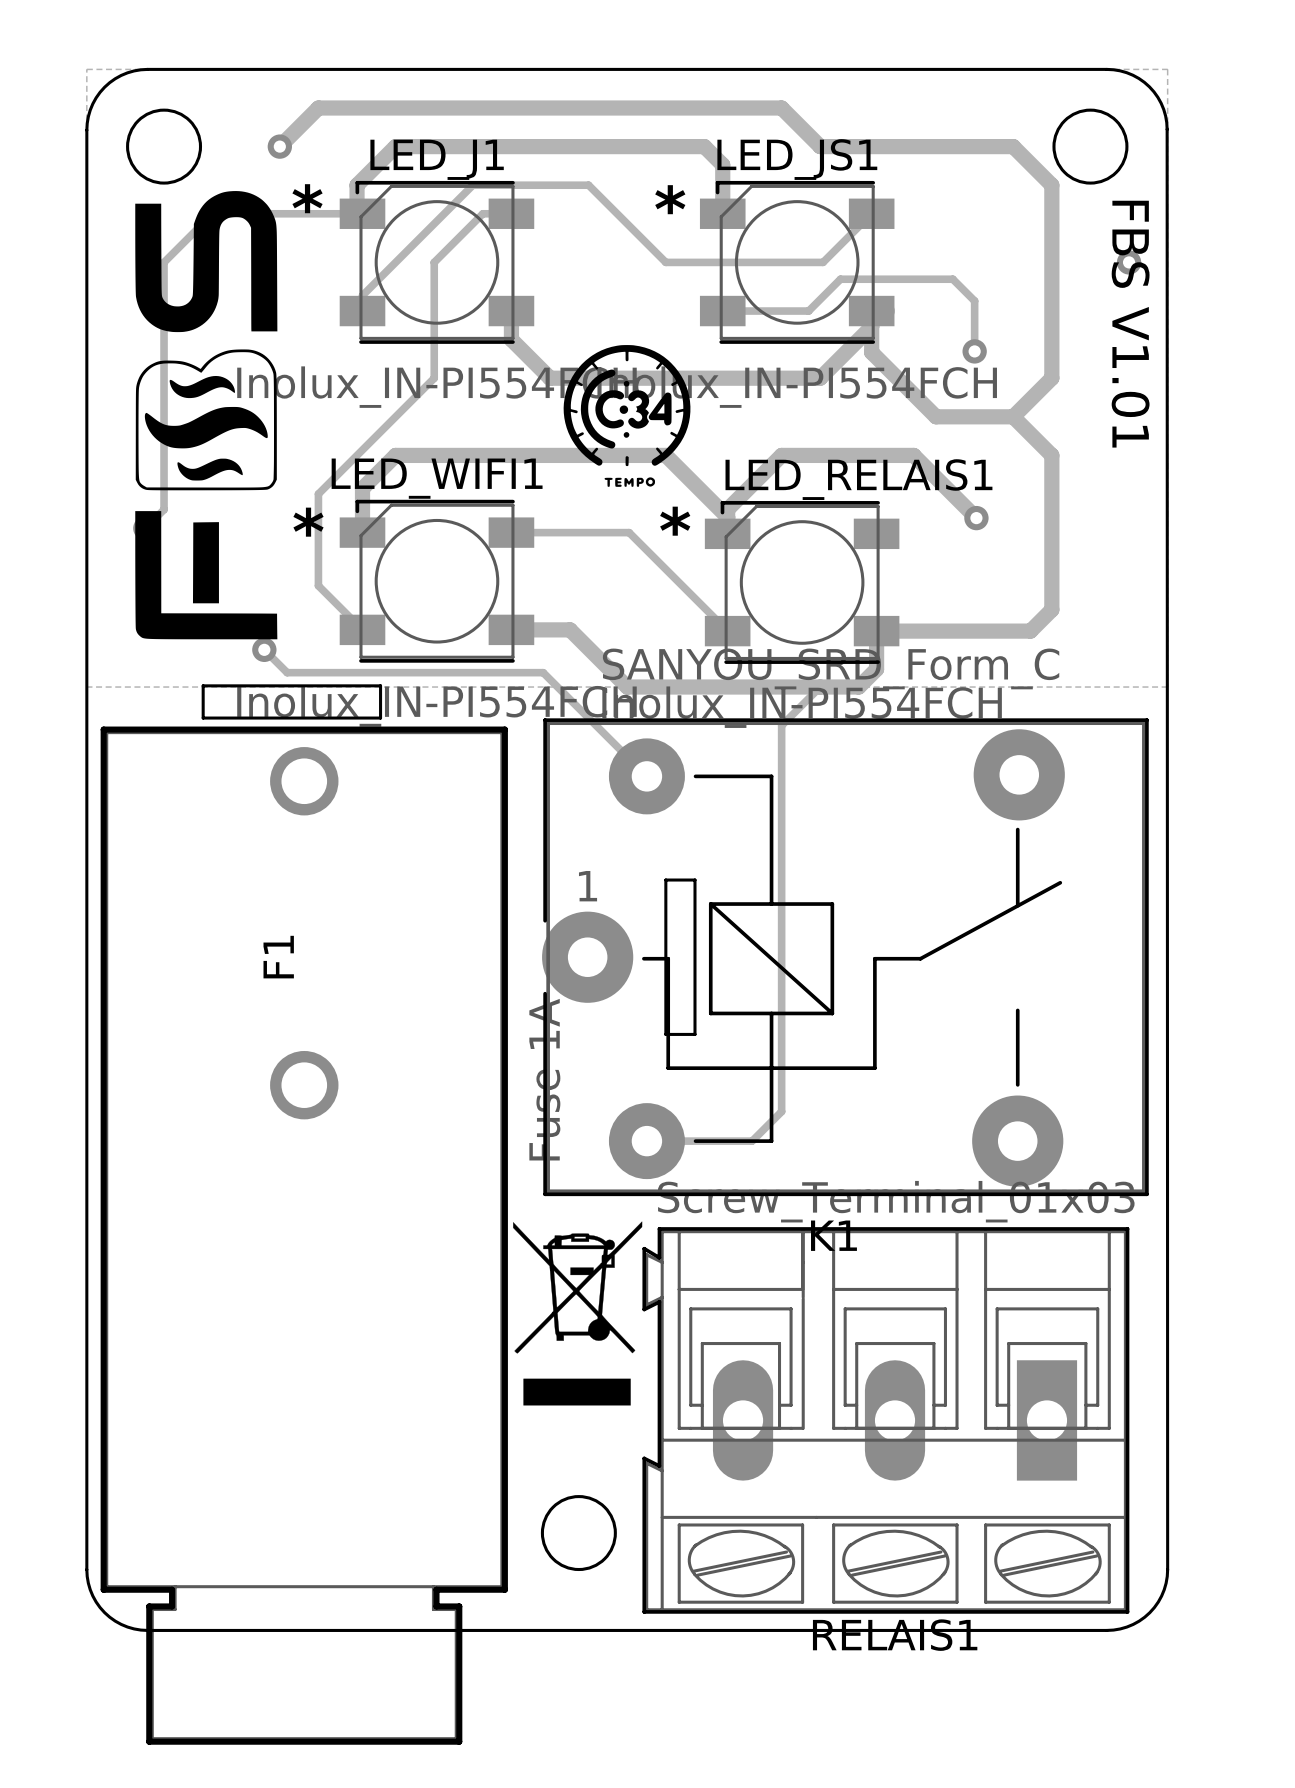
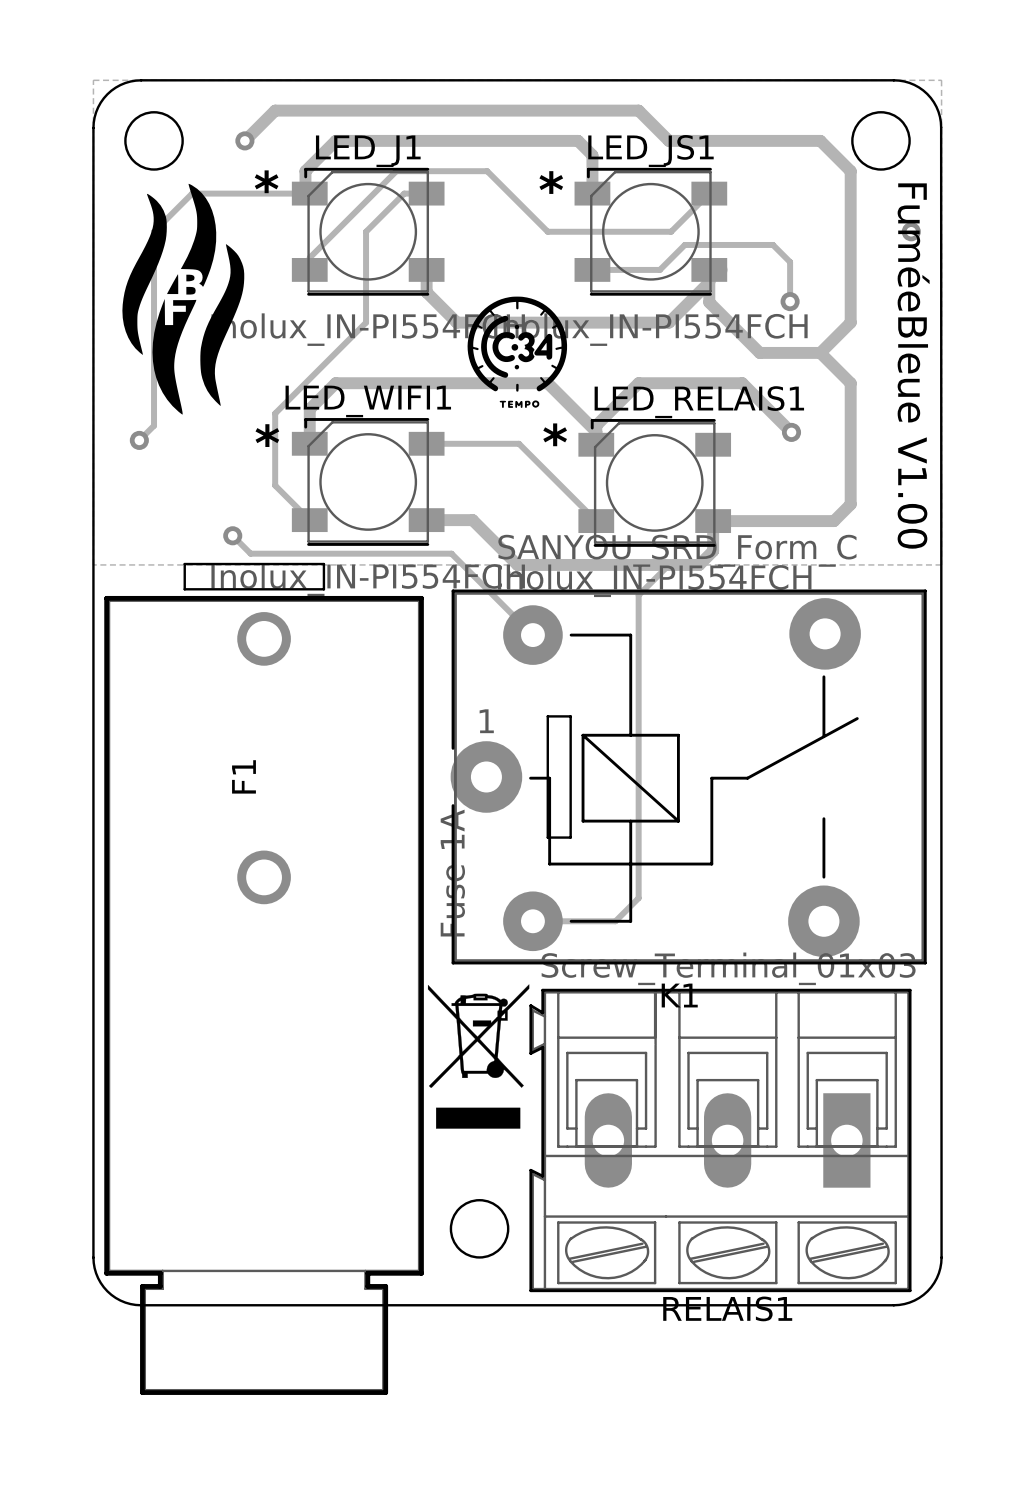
drawing: [135, 191, 278, 640] -> none
drawing: none -> [122, 183, 245, 415]
text: FBS V1.01 (1130, 324) -> FuméeBleue V1.00 (913, 366)

